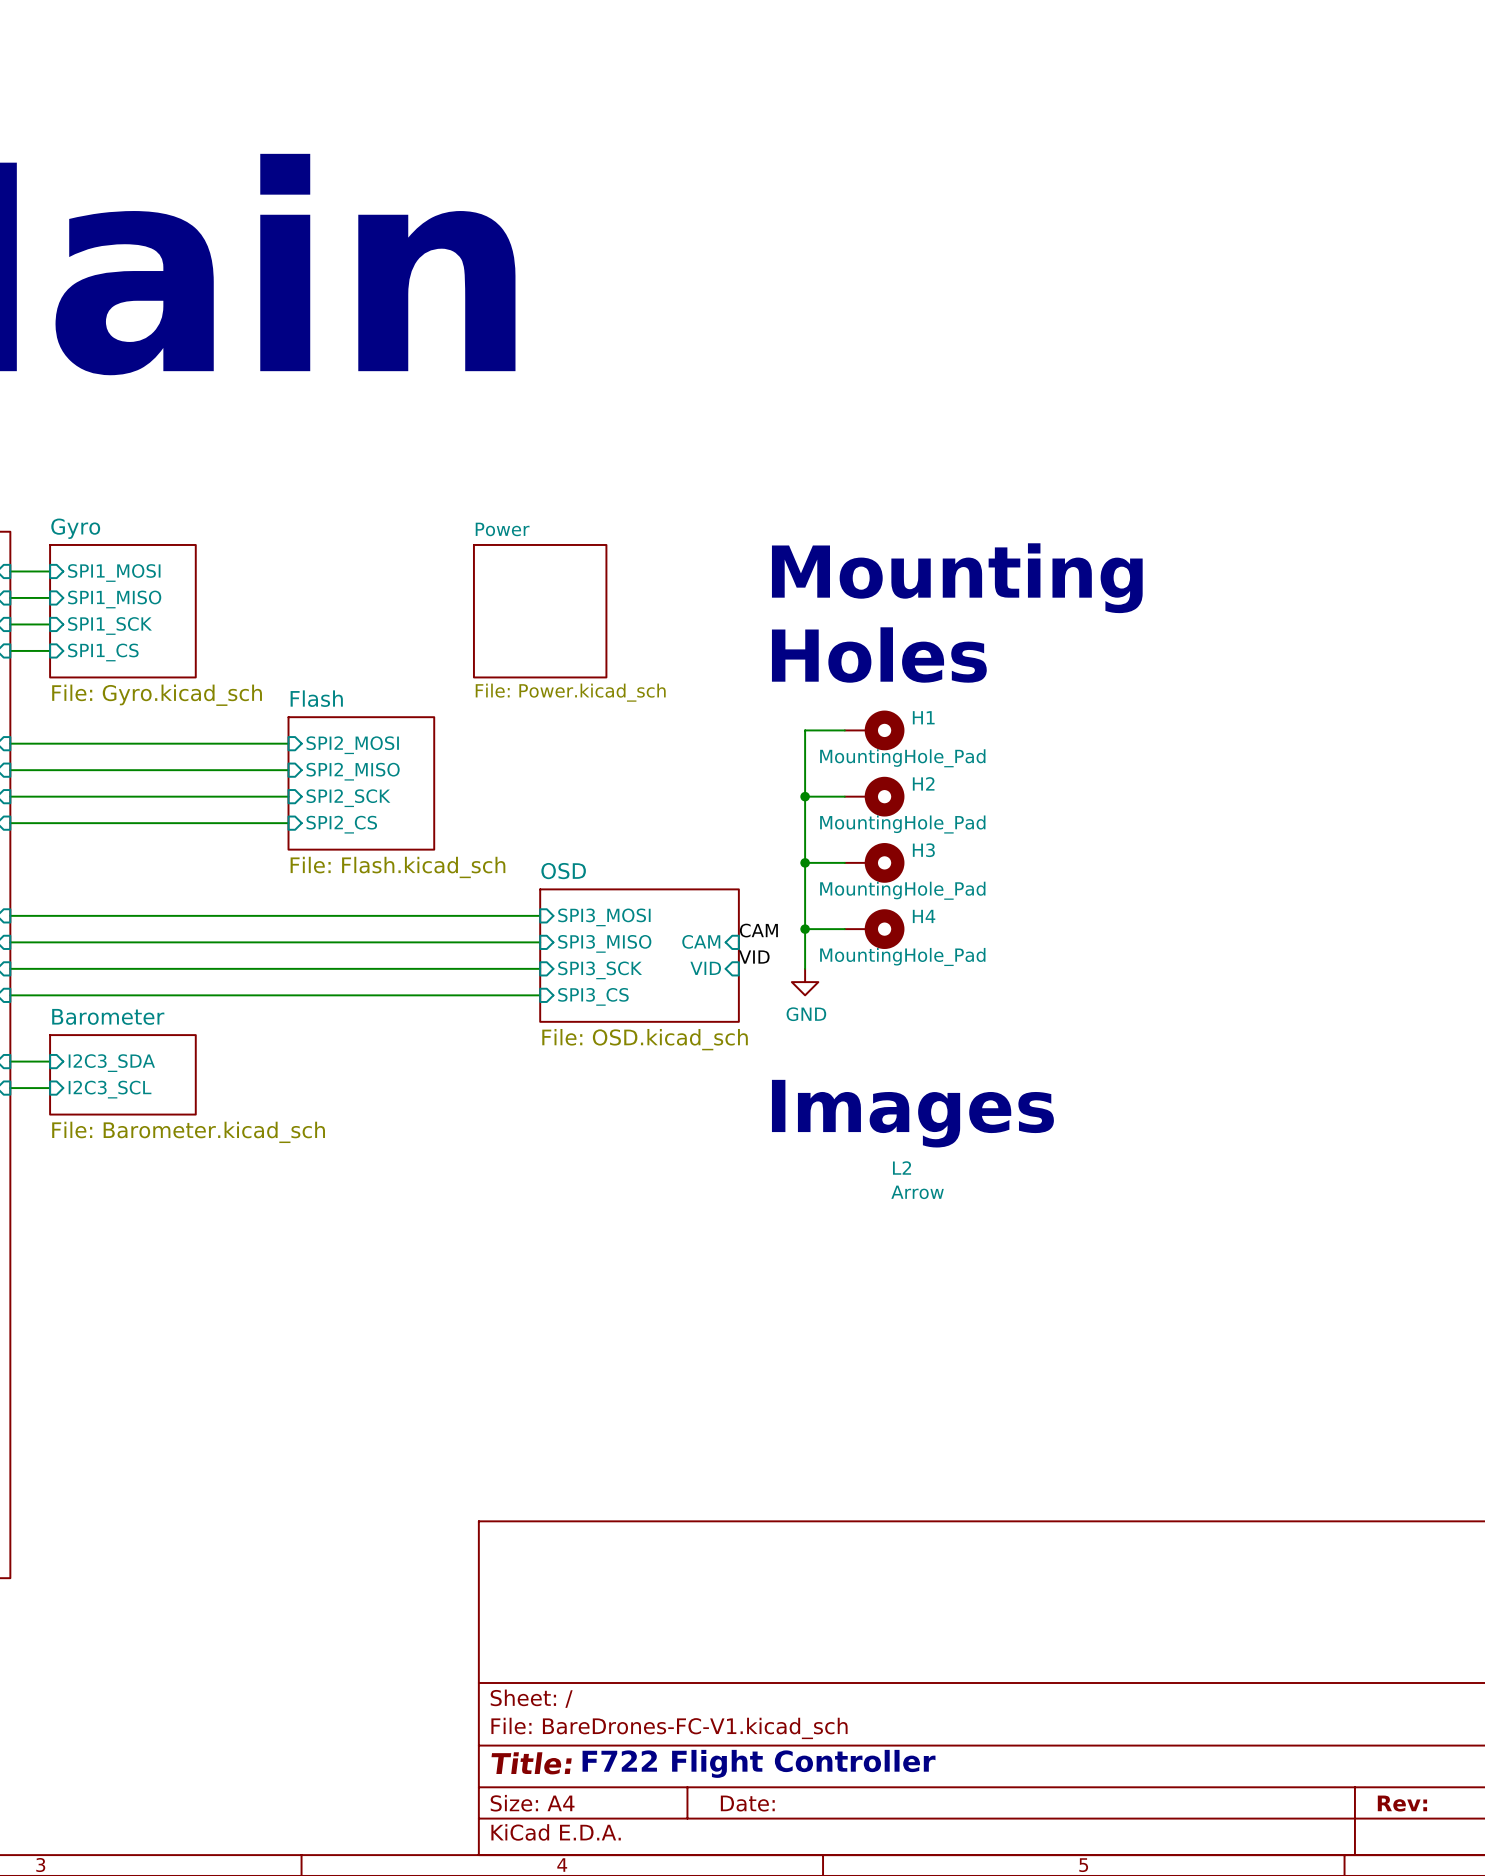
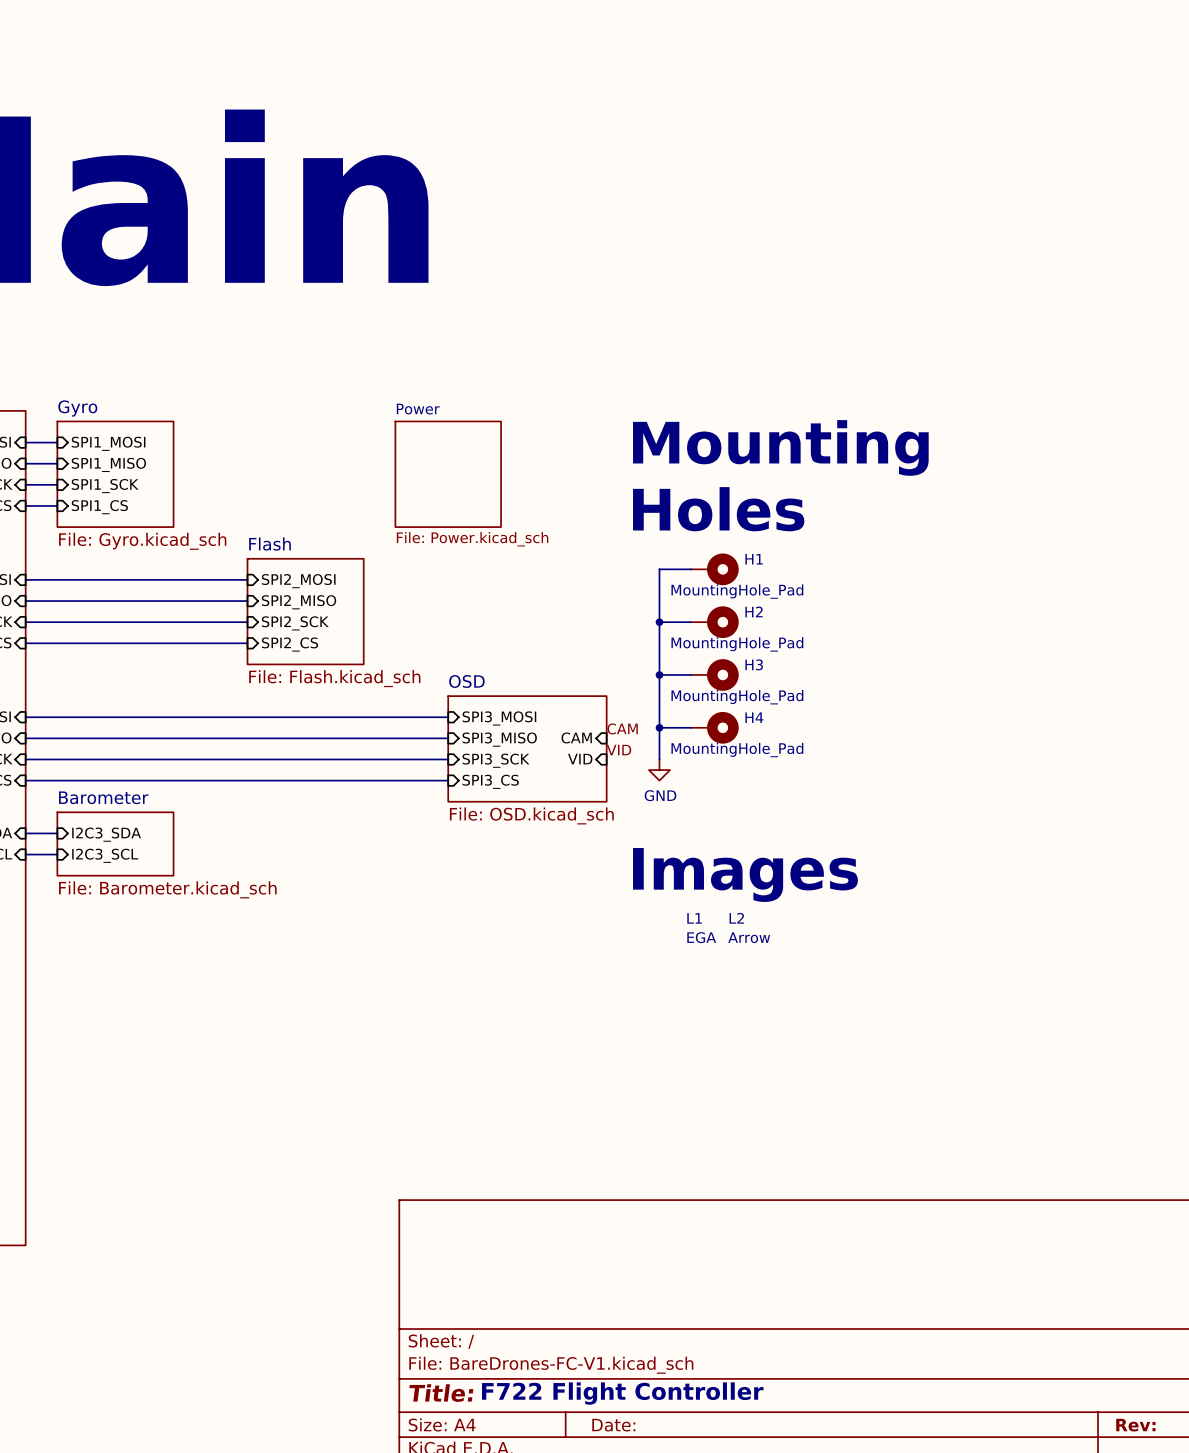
L1: none -> EGA (701, 928)

